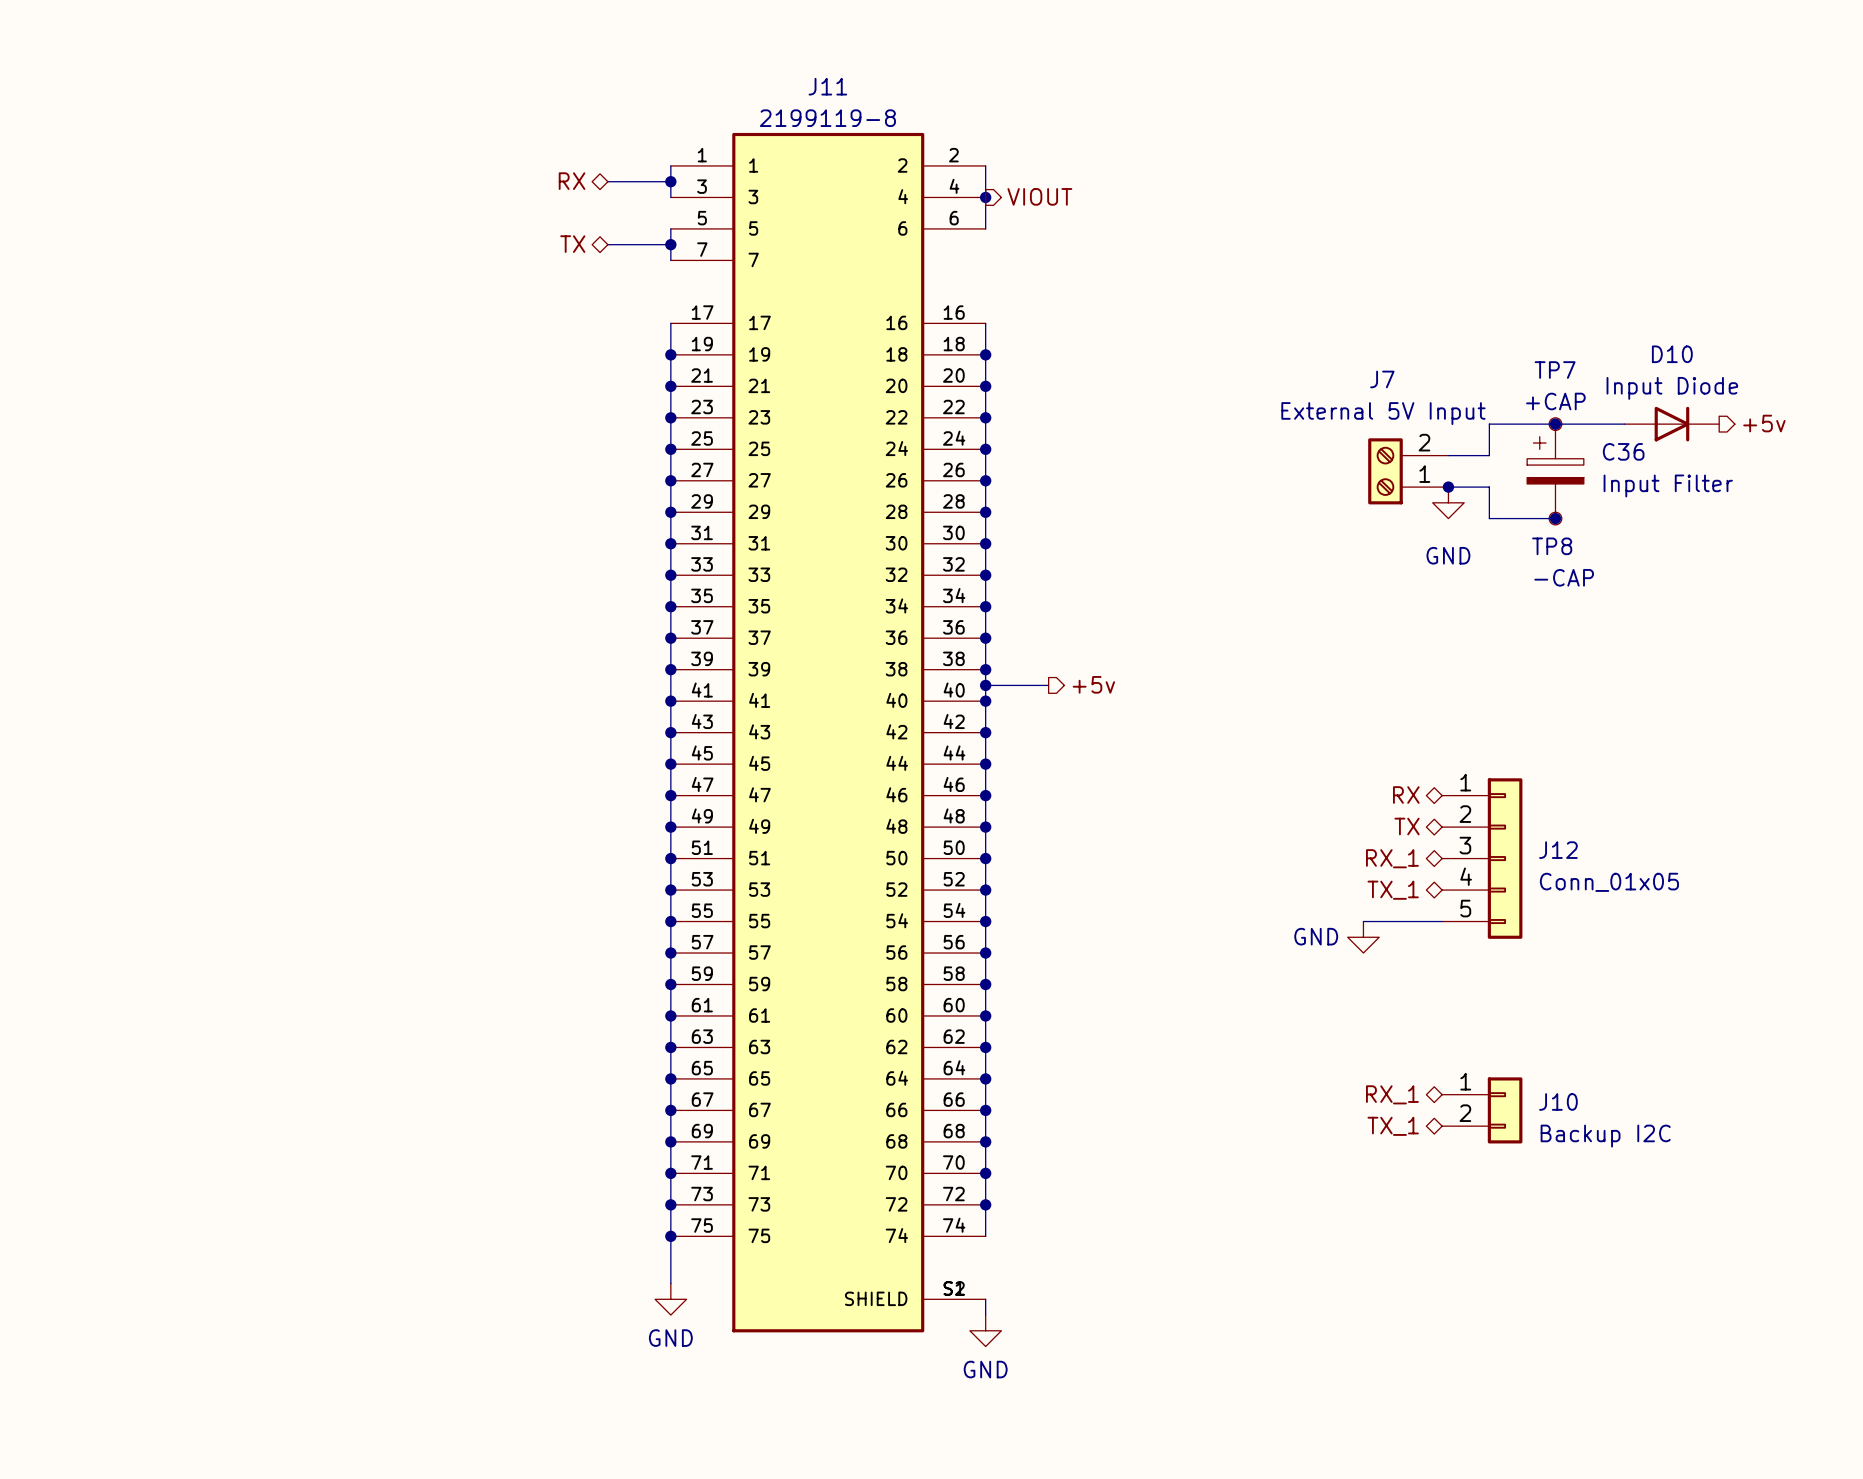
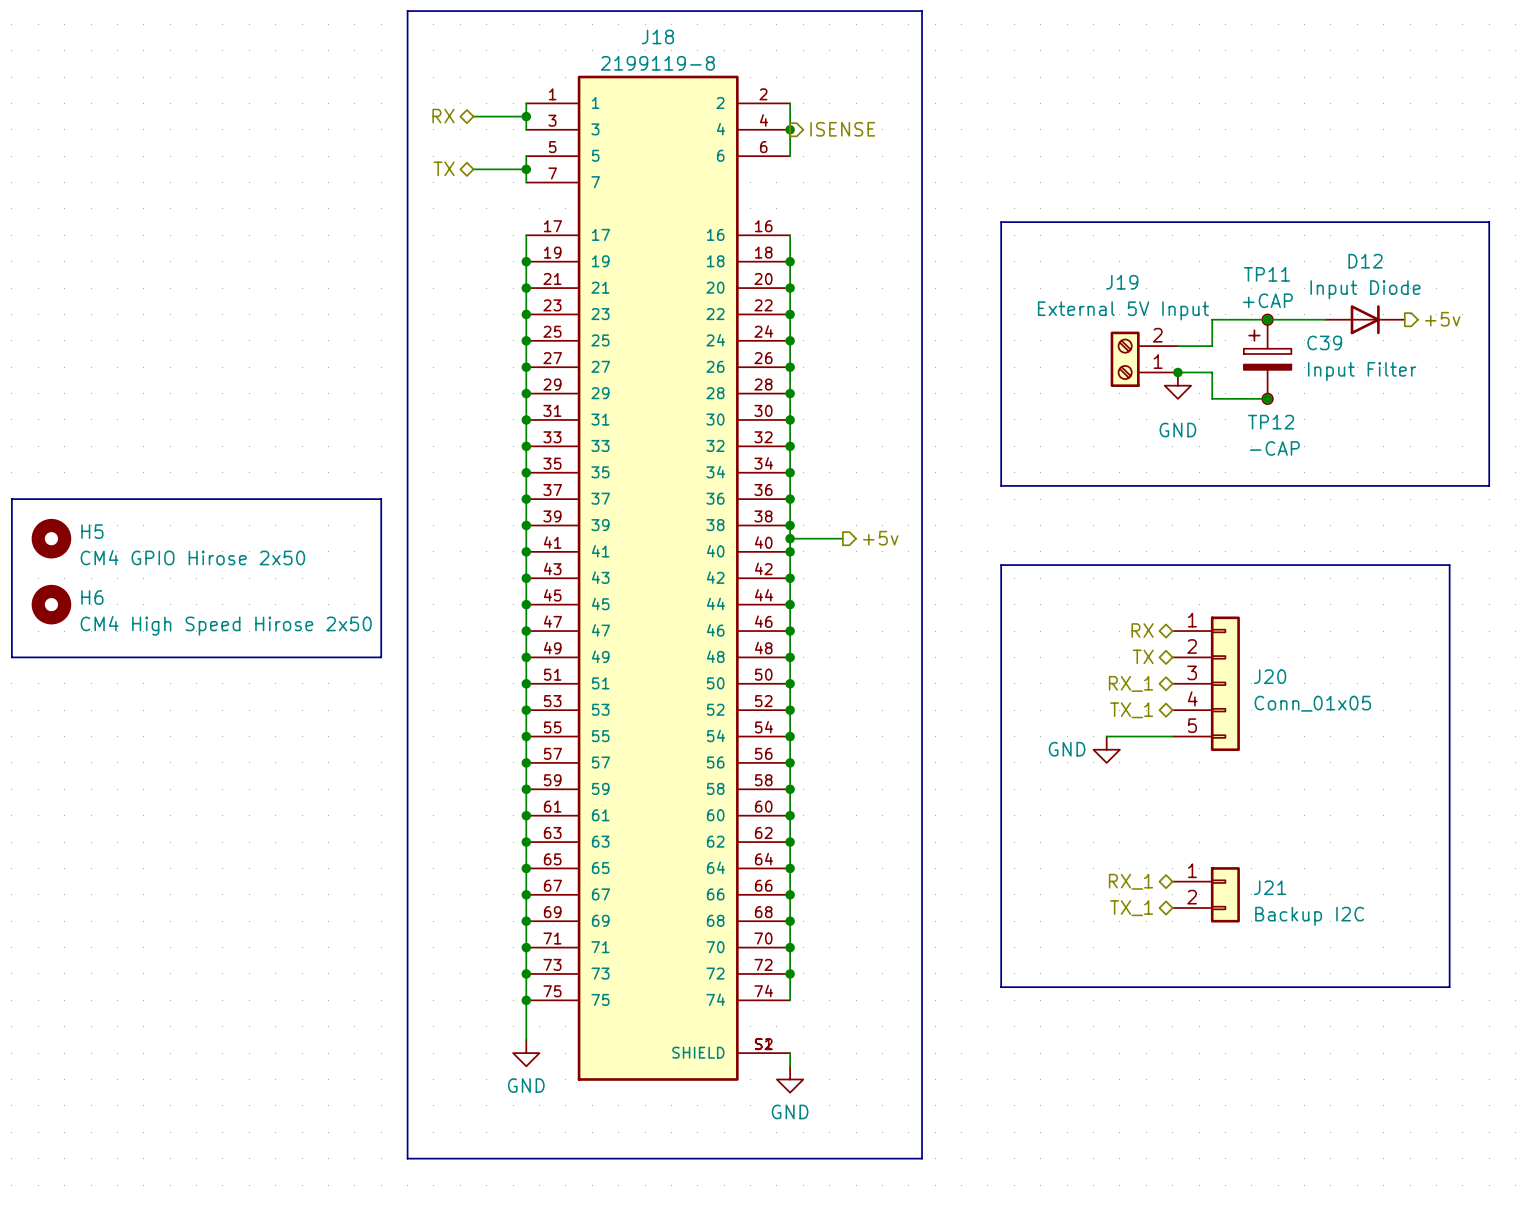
line: none -> (407, 11) (922, 11) (922, 1158) (407, 1158) (407, 11)
J11 name: J11 (827, 86) -> J18 (657, 36)
hierarchical label: VIOUT (1039, 196) -> ISENSE (842, 129)
line: none -> (1001, 222) (1001, 485) (1489, 485) (1489, 222) (1001, 222)
D10 name: D10 (1672, 354) -> D12 (1365, 261)
TP7 name: TP7 (1555, 370) -> TP11 (1266, 274)
J7 name: J7 (1382, 379) -> J19 (1122, 282)
C36 name: C36 (1623, 451) -> C39 (1324, 342)
TP8 name: TP8 (1552, 546) -> TP12 (1271, 422)
line: none -> (11, 499) (381, 499) (381, 657) (11, 657) (11, 499)
H5: none -> CM4 GPIO Hirose 2x50 (51, 538)
line: none -> (1001, 565) (1449, 565) (1449, 987) (1001, 987) (1001, 565)
H6: none -> CM4 High Speed Hirose 2x50 (51, 604)
J12 name: J12 (1558, 850) -> J20 (1270, 676)
J10 name: J10 (1558, 1101) -> J21 (1270, 887)

